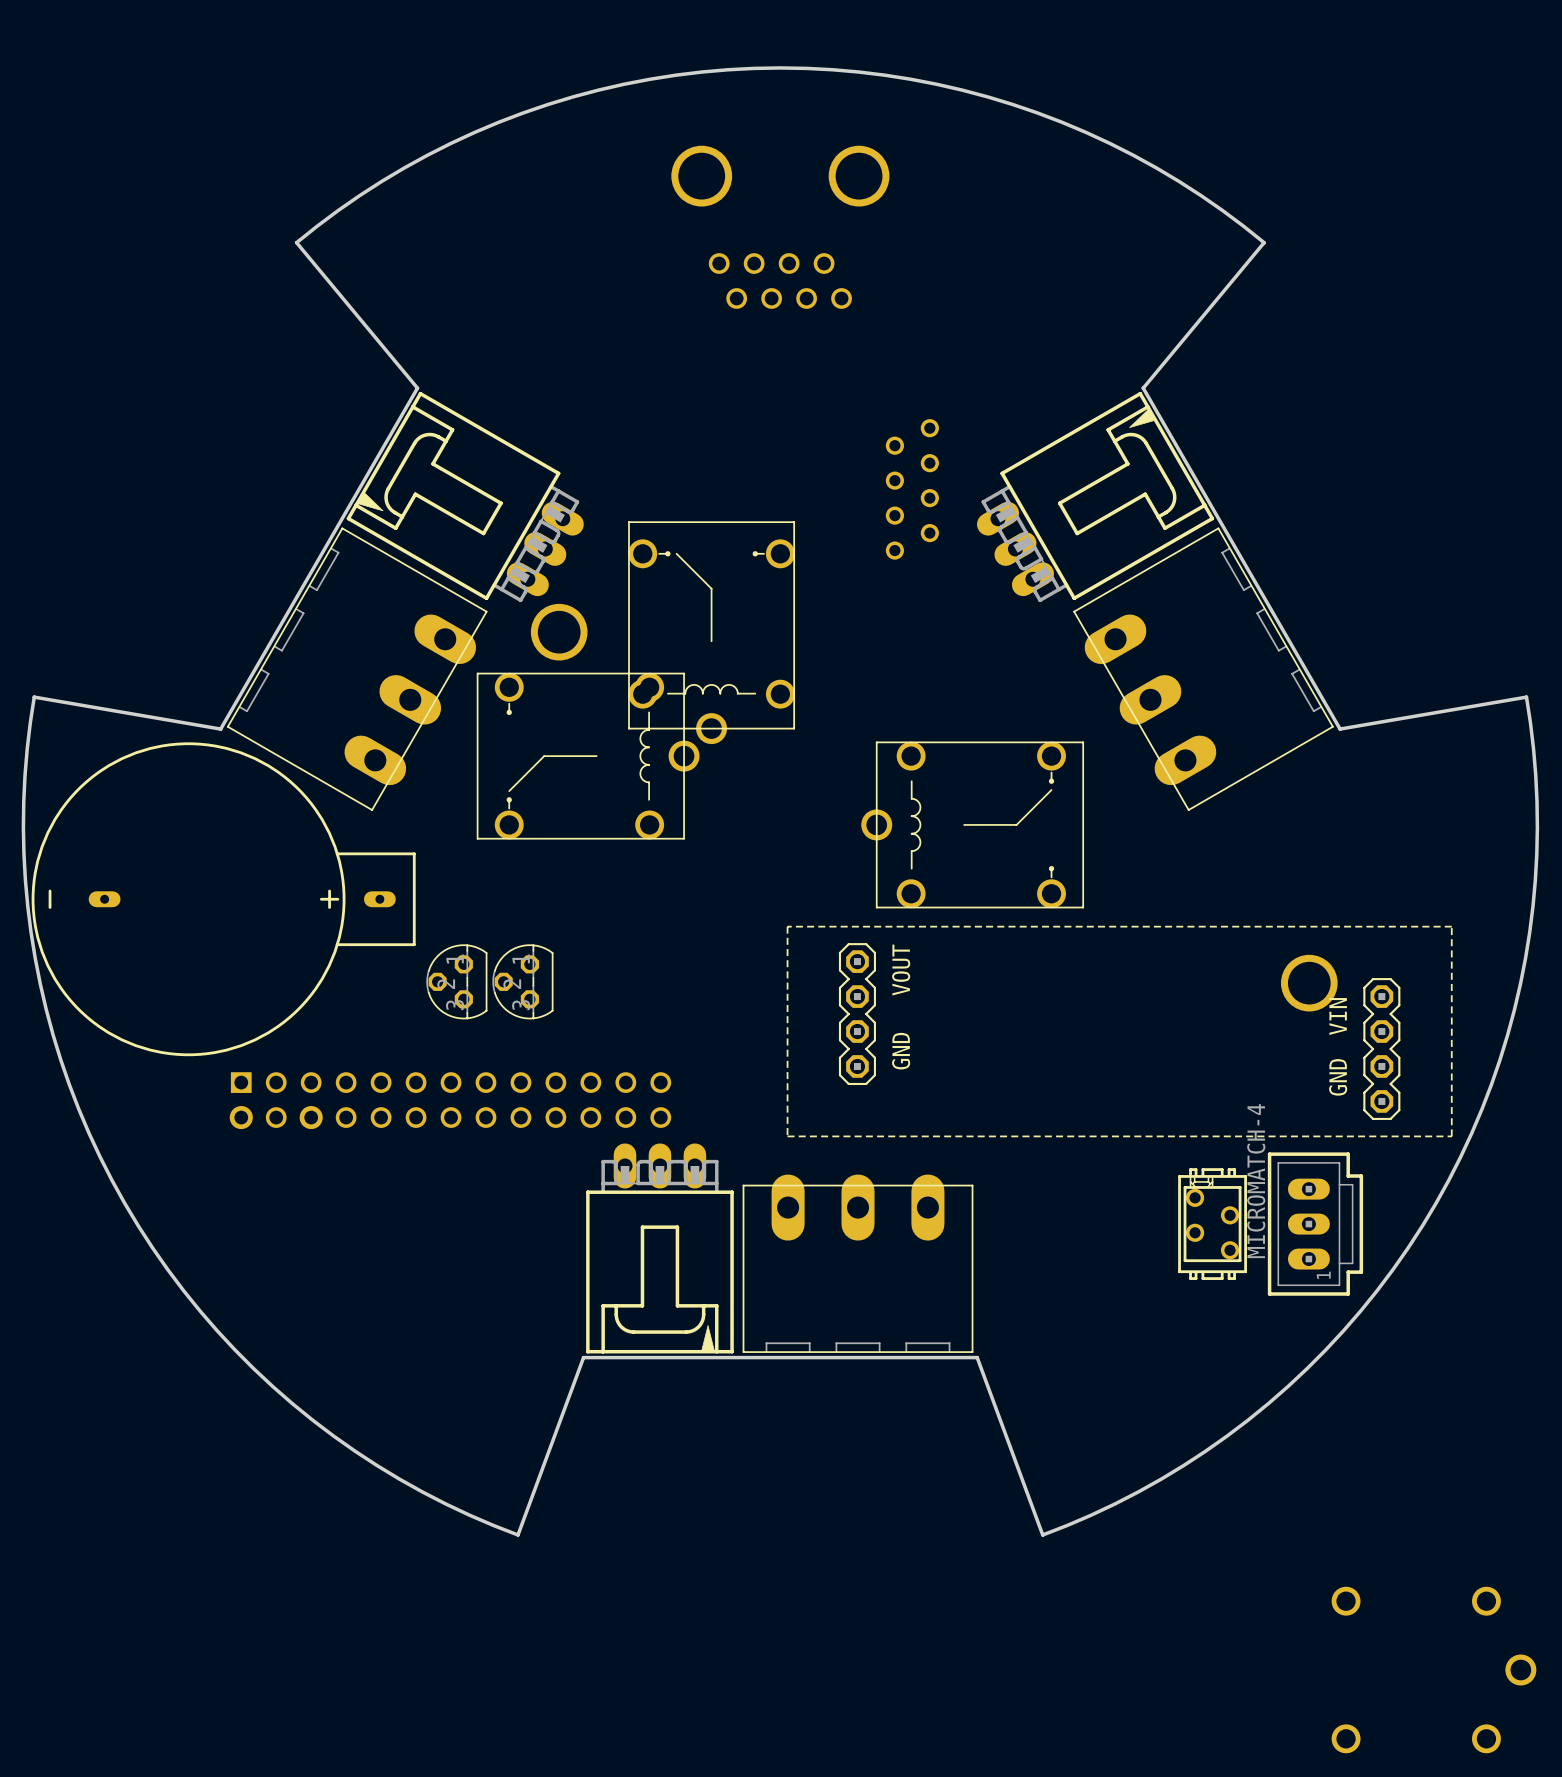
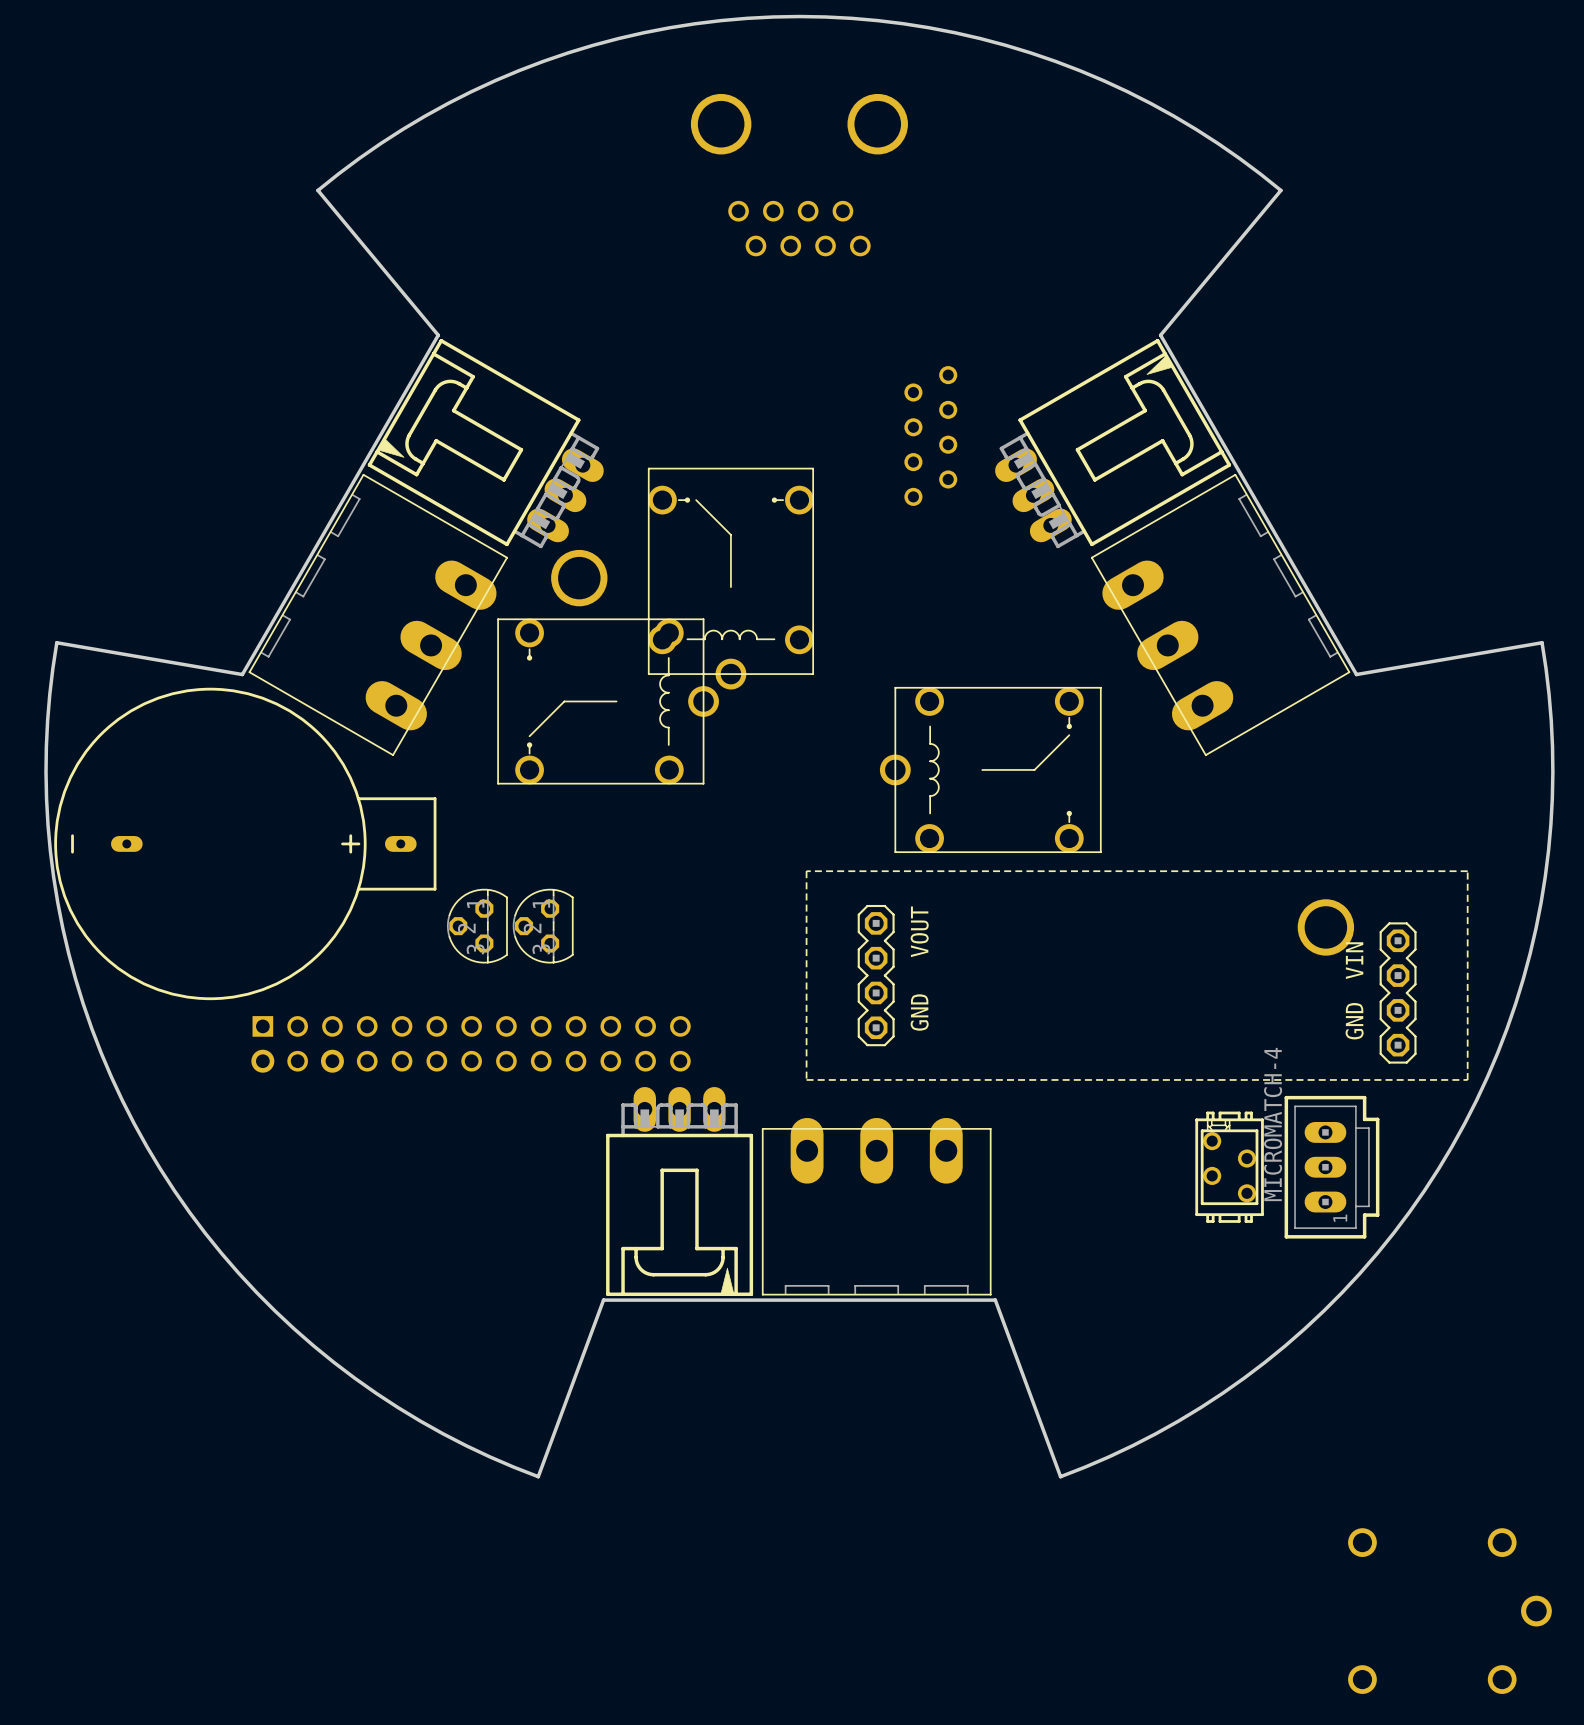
part footprint: [786, 925, 1453, 1138] -> [805, 870, 1469, 1081]

